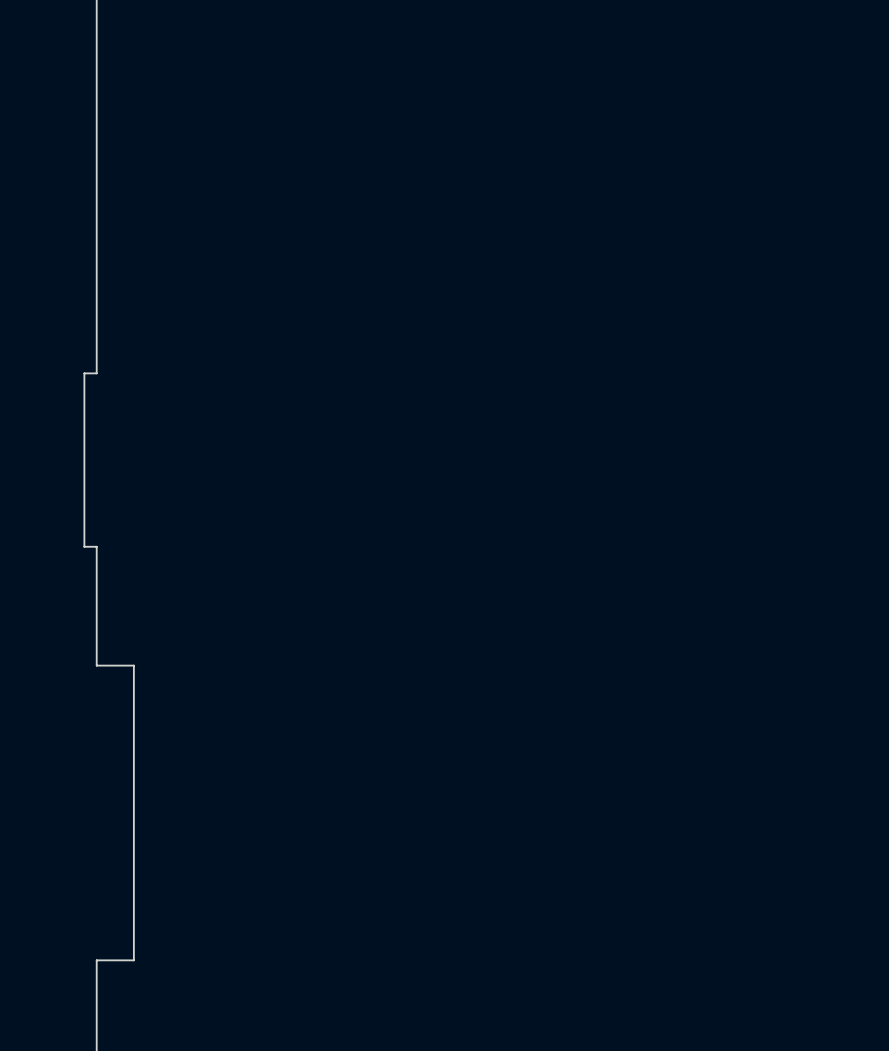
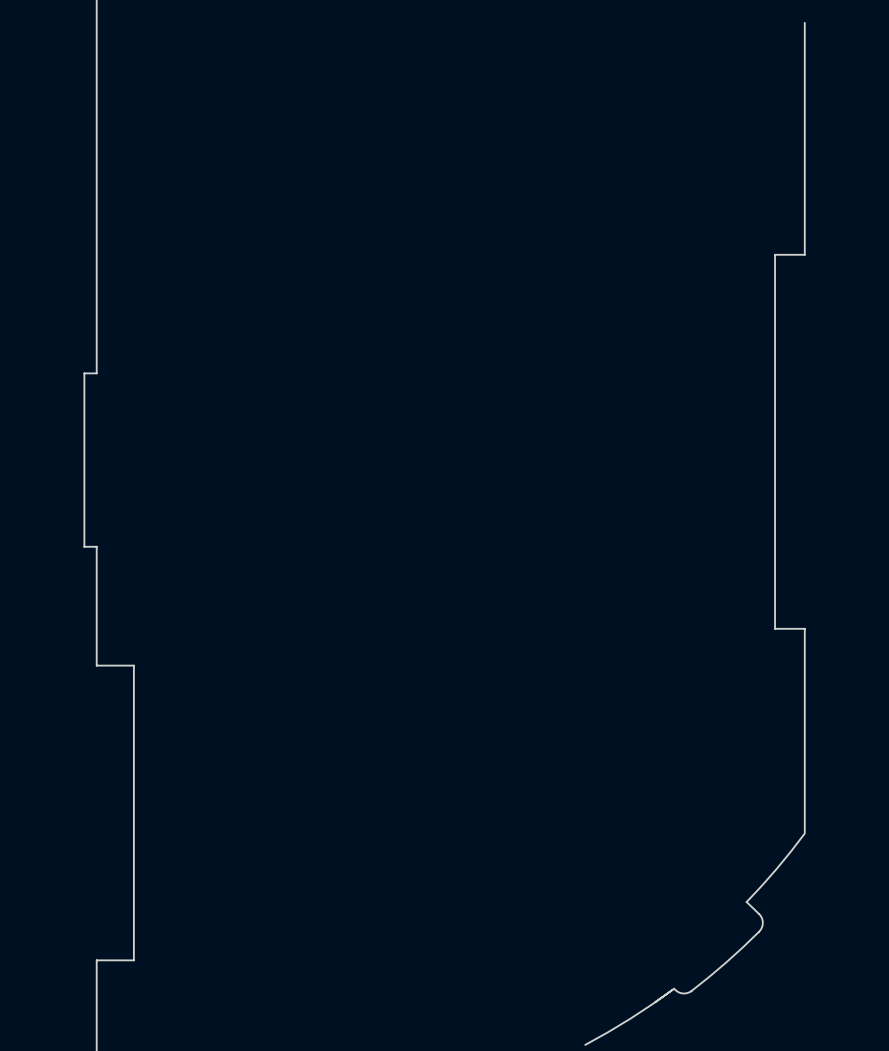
board edge: none -> (804, 22) (804, 254) (775, 254) (775, 628) (804, 628) (804, 833)
board edge: none -> (804, 834) (746, 902)
board edge: none -> (746, 901) (761, 917) (762, 924) (760, 929) (726, 962) (691, 991)
board edge: none -> (674, 988) (682, 993) (691, 990)
board edge: none -> (654, 1002) (672, 989) (630, 1018) (585, 1044)

